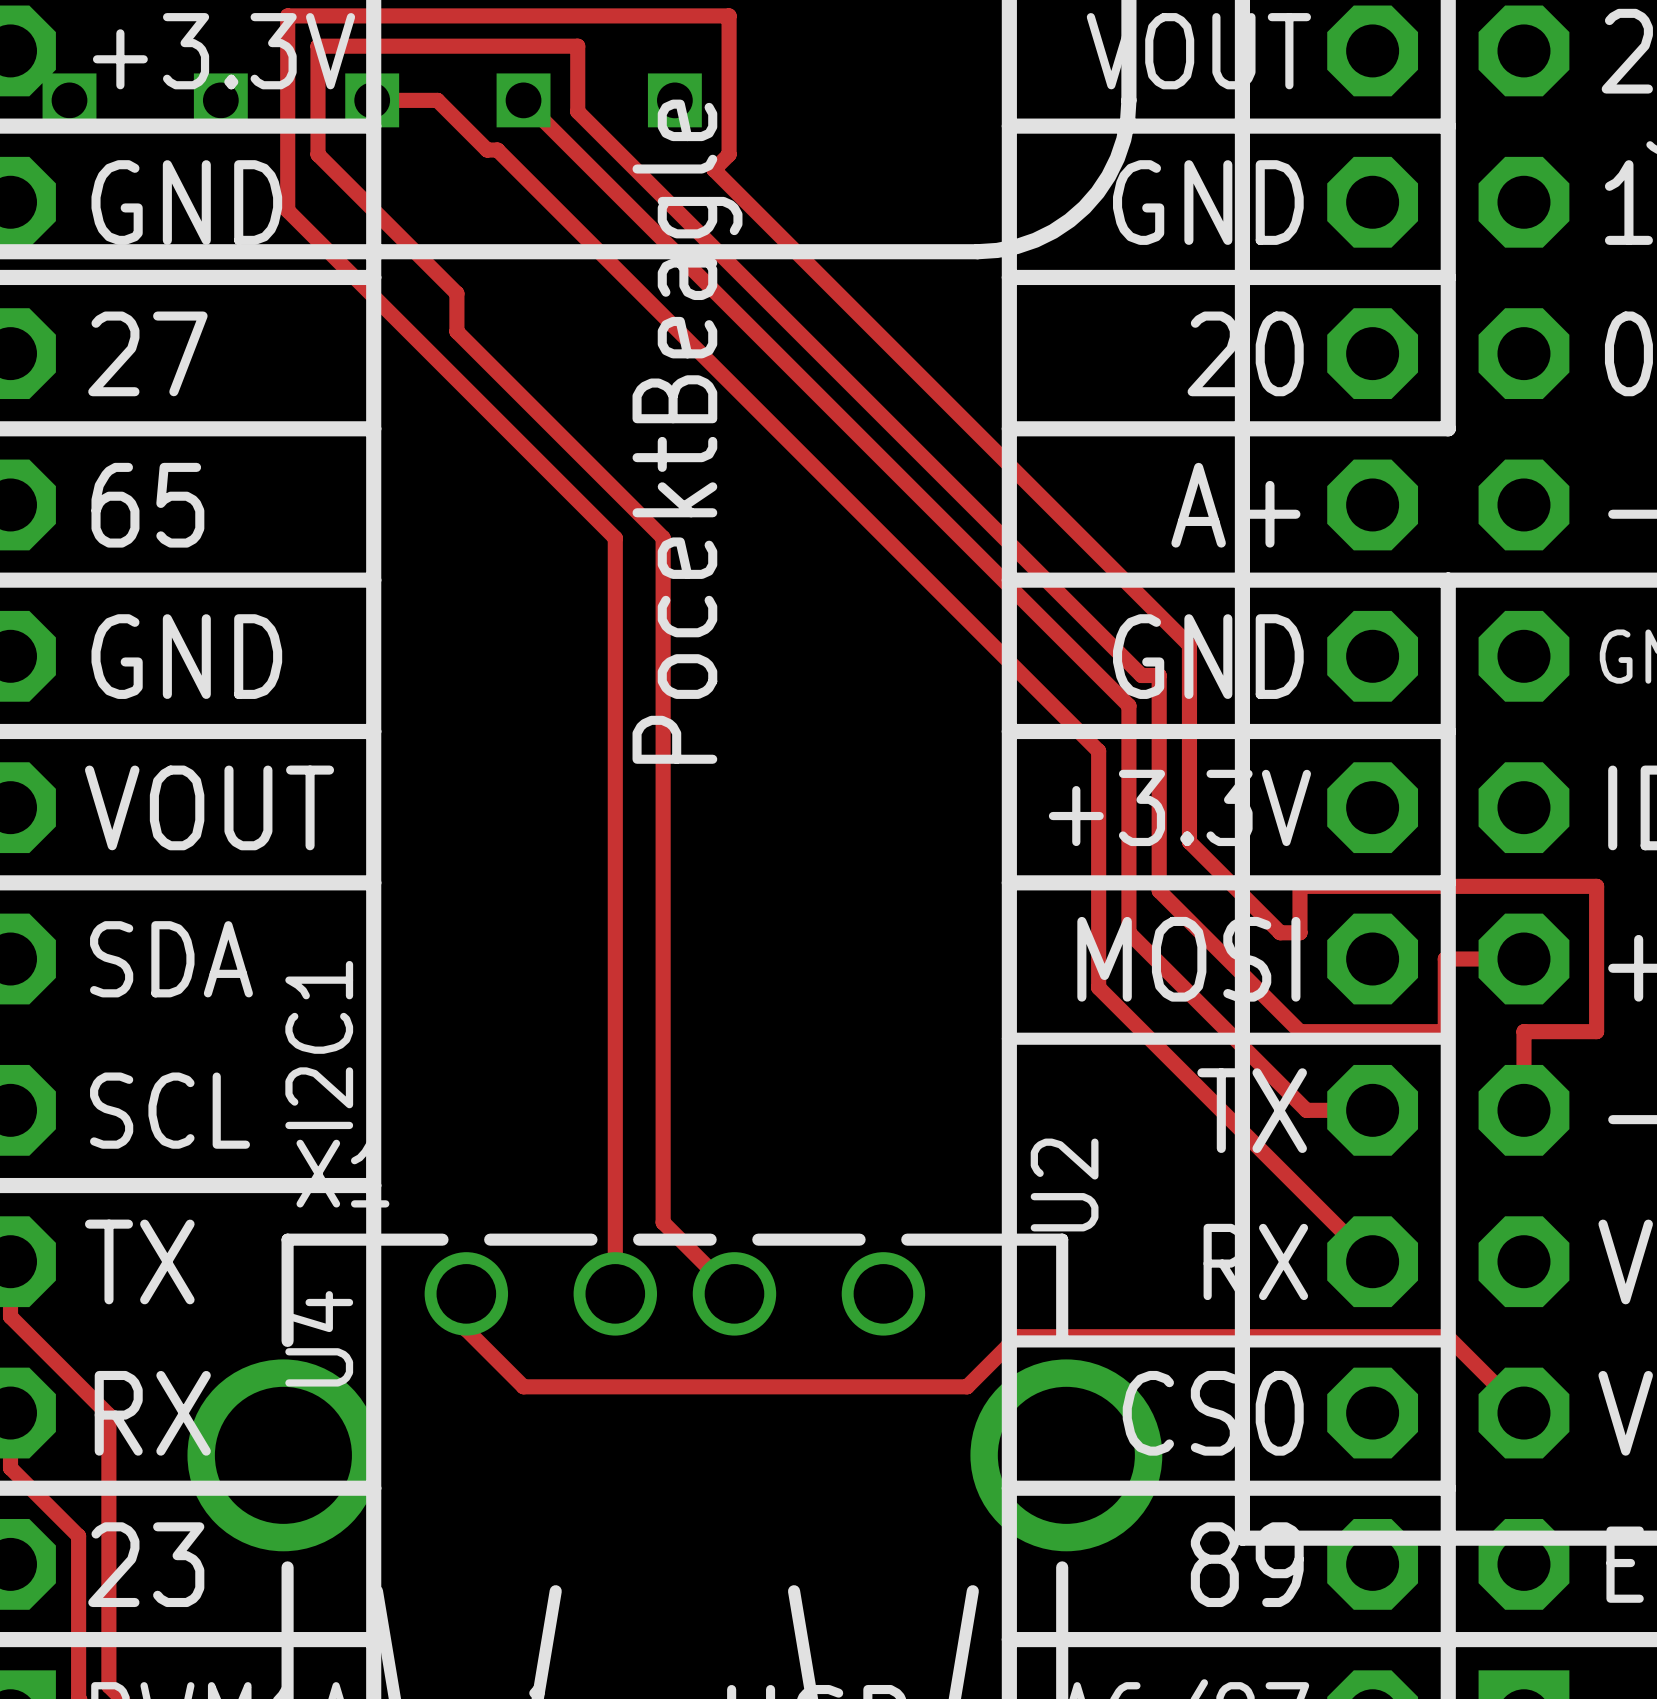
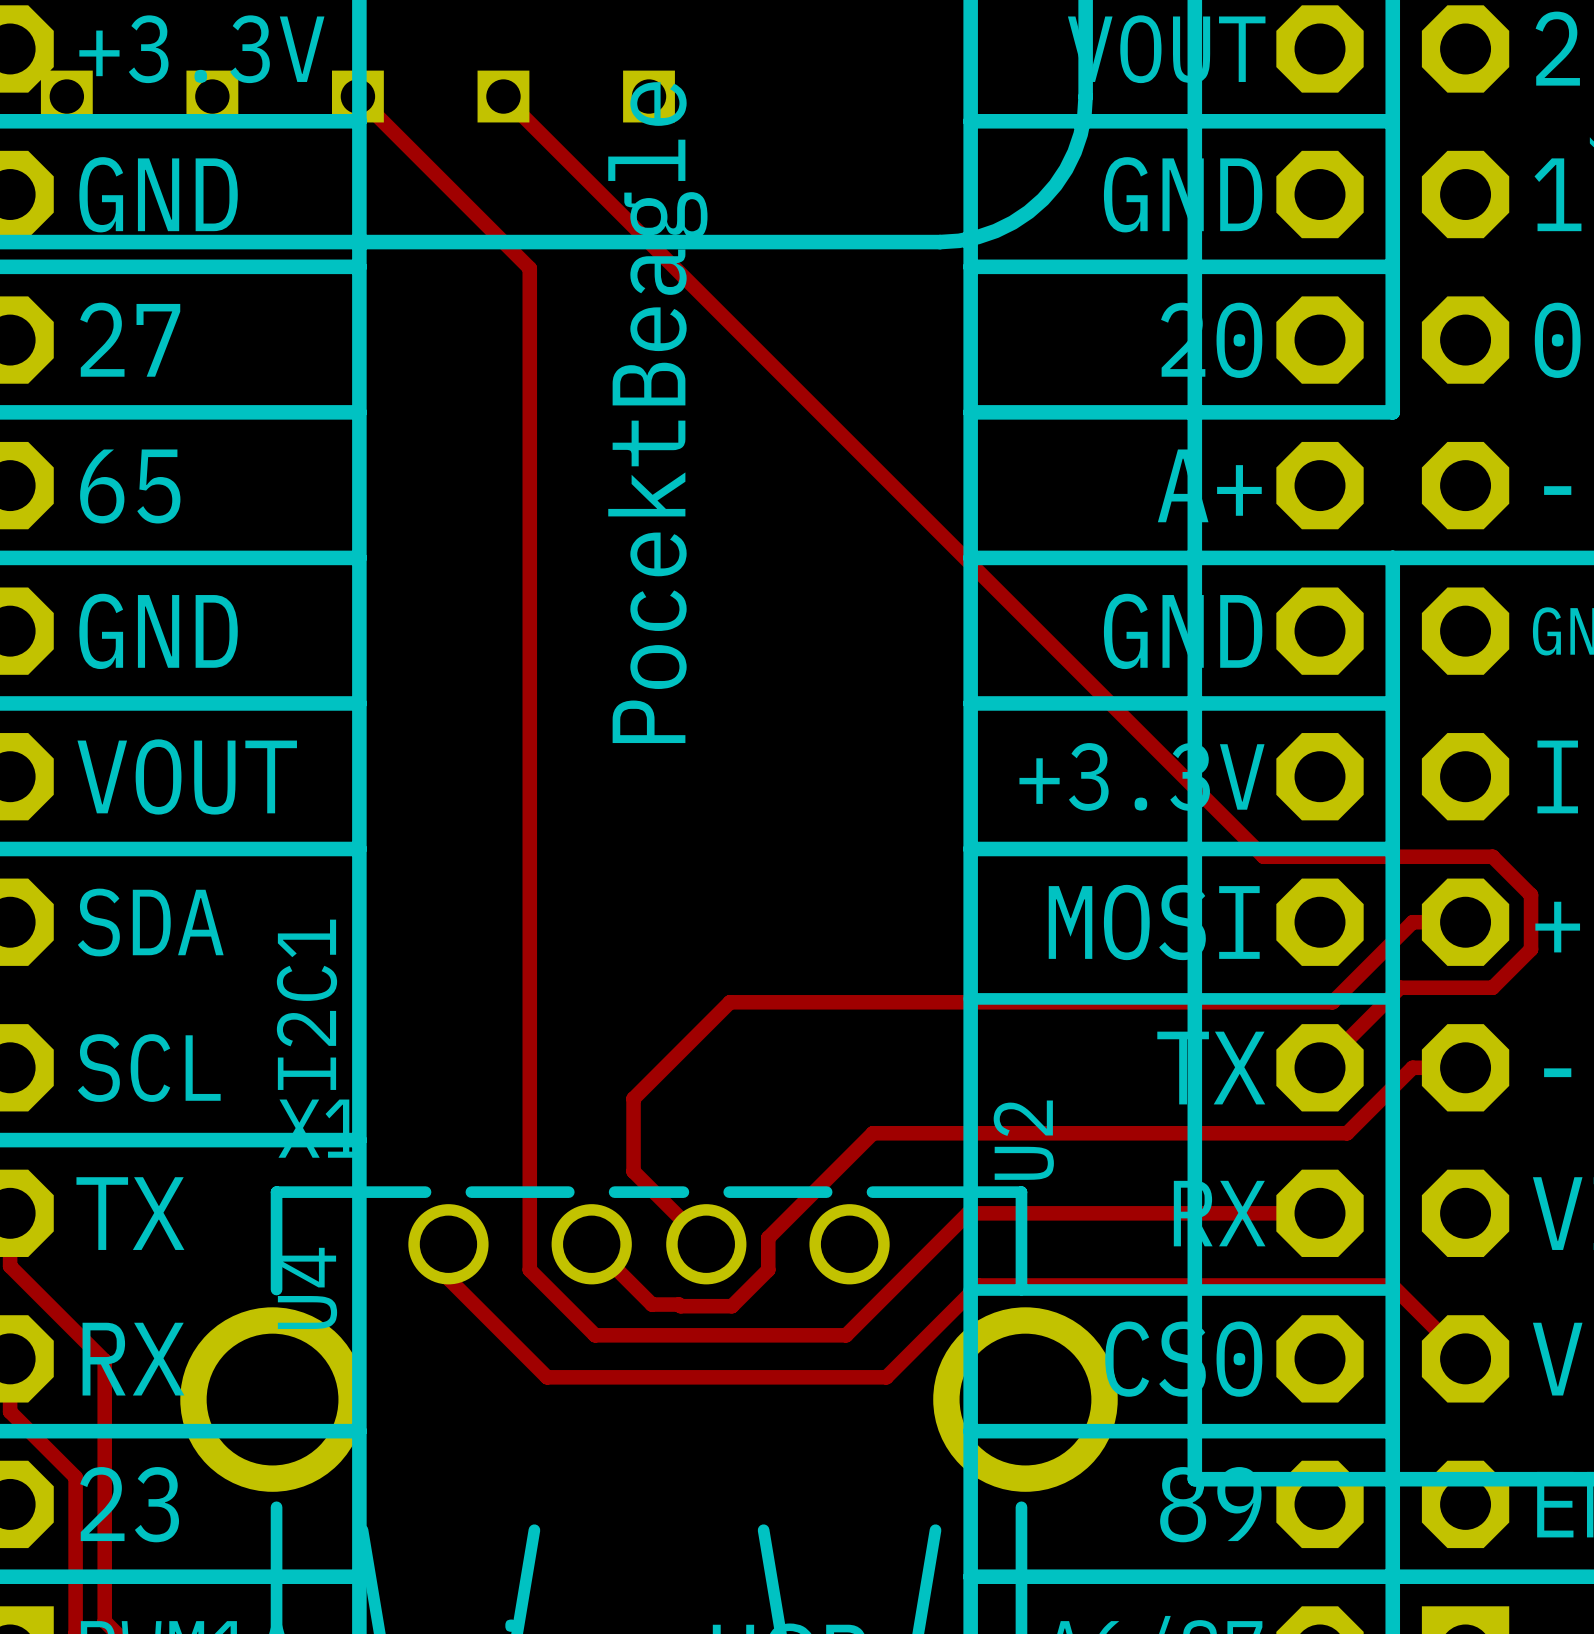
track: (372, 100) (437, 100) (487, 150) (497, 150) (1098, 751) (1098, 987) (1372, 1261) -> (357, 96) (529, 268) (529, 1269) (595, 1335) (846, 1335) (968, 1213) (1320, 1213)
track: (1128, 705) (1128, 932) (1306, 1110) (1372, 1110) -> (1085, 678) (1263, 856) (1492, 856) (1531, 895) (1531, 949) (1492, 987) (1400, 987) (1320, 1067)
track: (1468, 959) (1445, 959) (1445, 1031) (1299, 1031) (1159, 890) (1159, 675) (1141, 675) (577, 111) (577, 46) (317, 46) (317, 154) (456, 293) (456, 331) (663, 537) (663, 1222) -> (1412, 922) (1332, 1002) (729, 1002) (633, 1098) (633, 1171) (637, 1175)
track: (1523, 1110) (1523, 1031) (1596, 1031) (1596, 886) (1299, 886) (1299, 932) (1280, 932) (1189, 841) (1189, 645) (713, 169) (729, 154) (729, 15) (287, 15) (287, 210) (615, 538) (615, 1293) -> (1465, 1067) (1412, 1067) (1347, 1133) (872, 1133) (768, 1237) (768, 1269) (731, 1306) (651, 1304) (591, 1244)
track: (523, 1386) (967, 1386) -> (503, 1333) (547, 1377) (886, 1377) (930, 1333)

